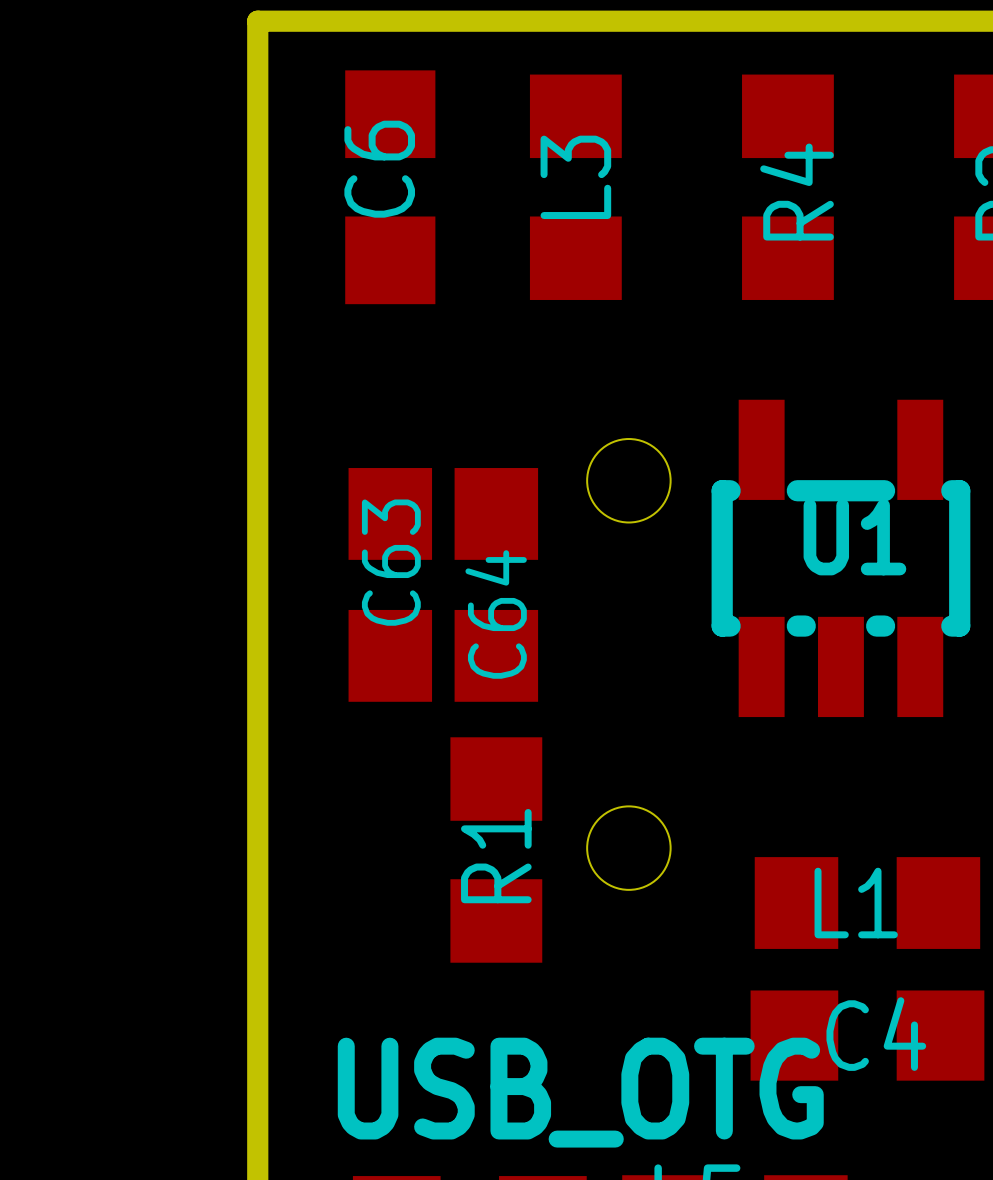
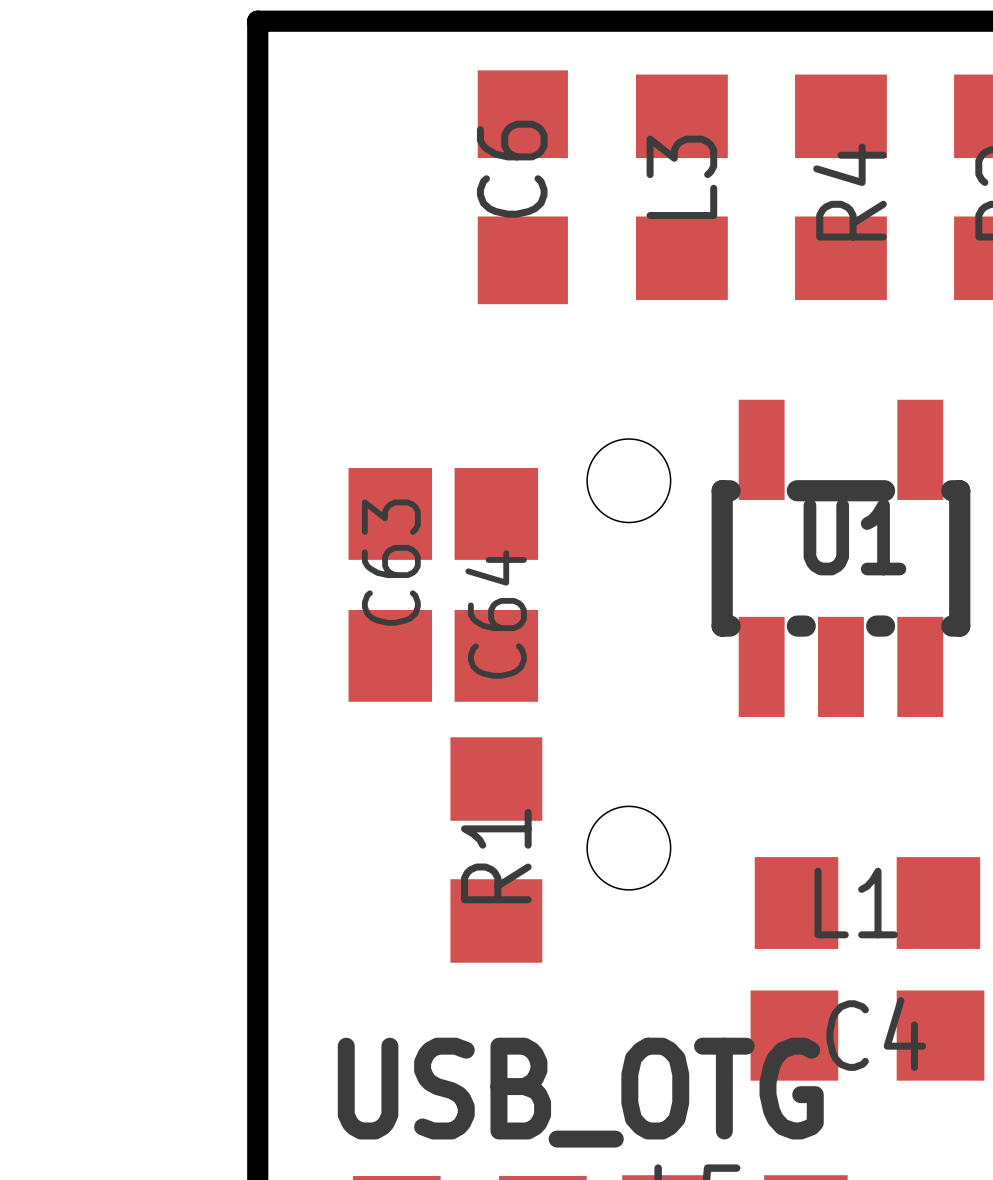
C6 position: (390, 187) -> (522, 187)
L3 position: (575, 187) -> (681, 187)
R4 position: (787, 187) -> (840, 187)

